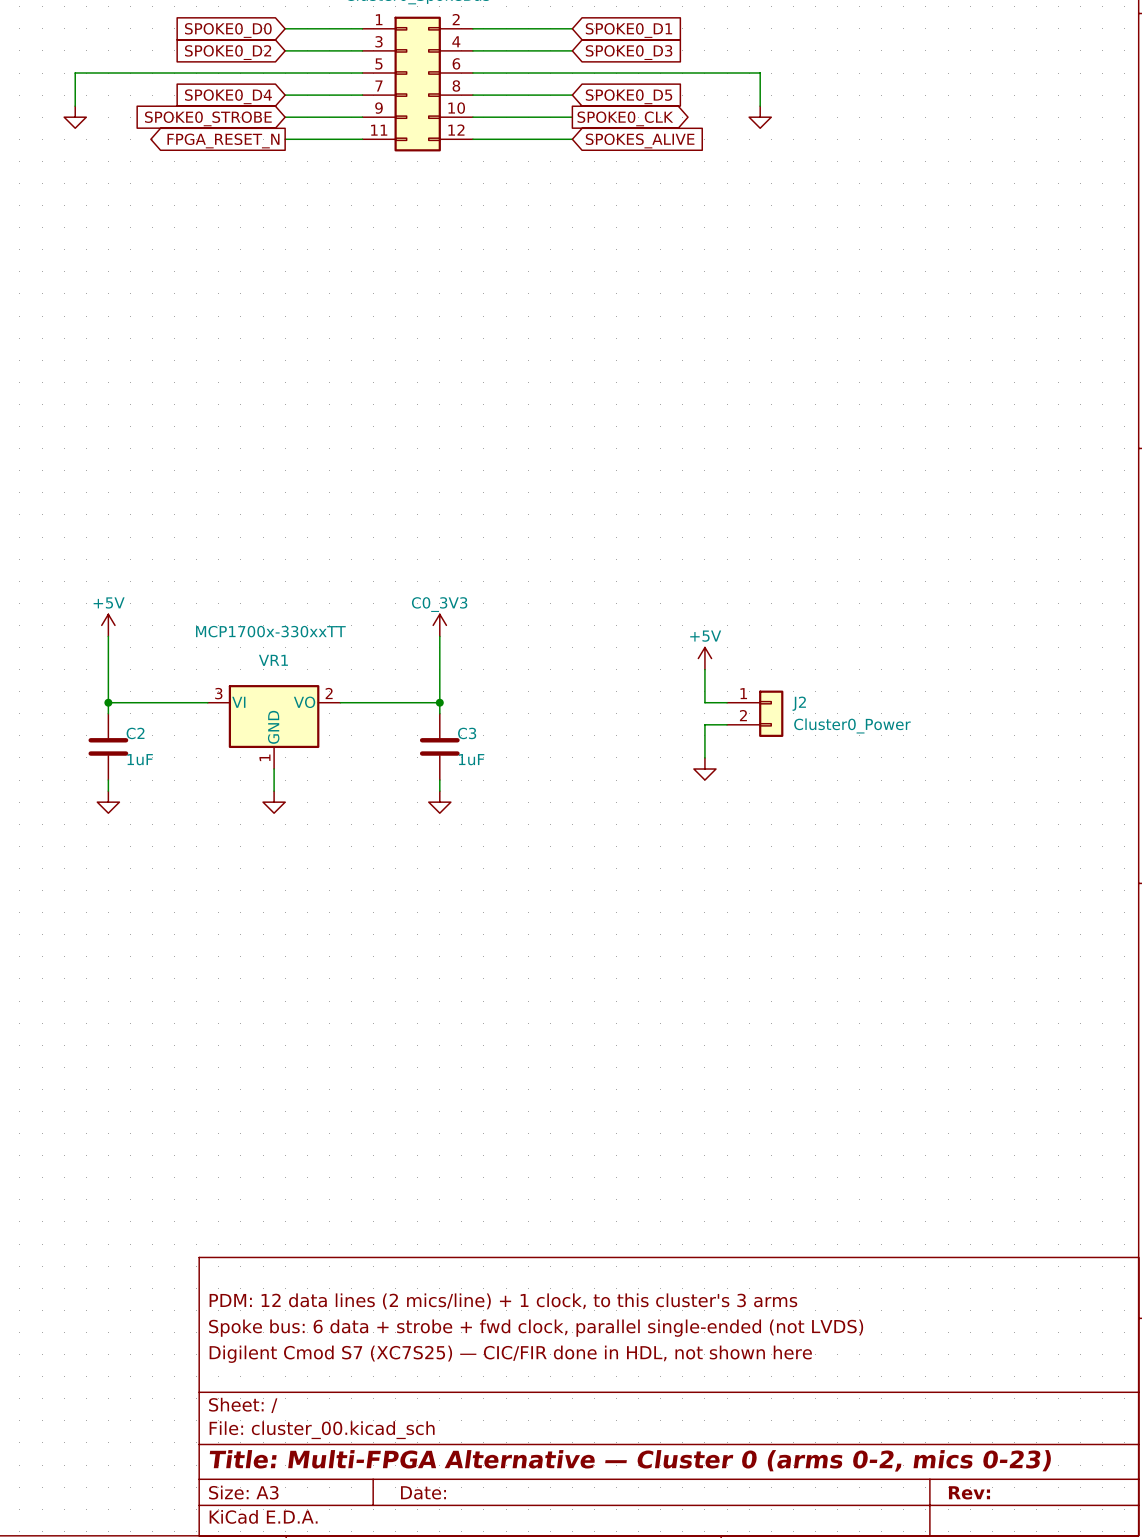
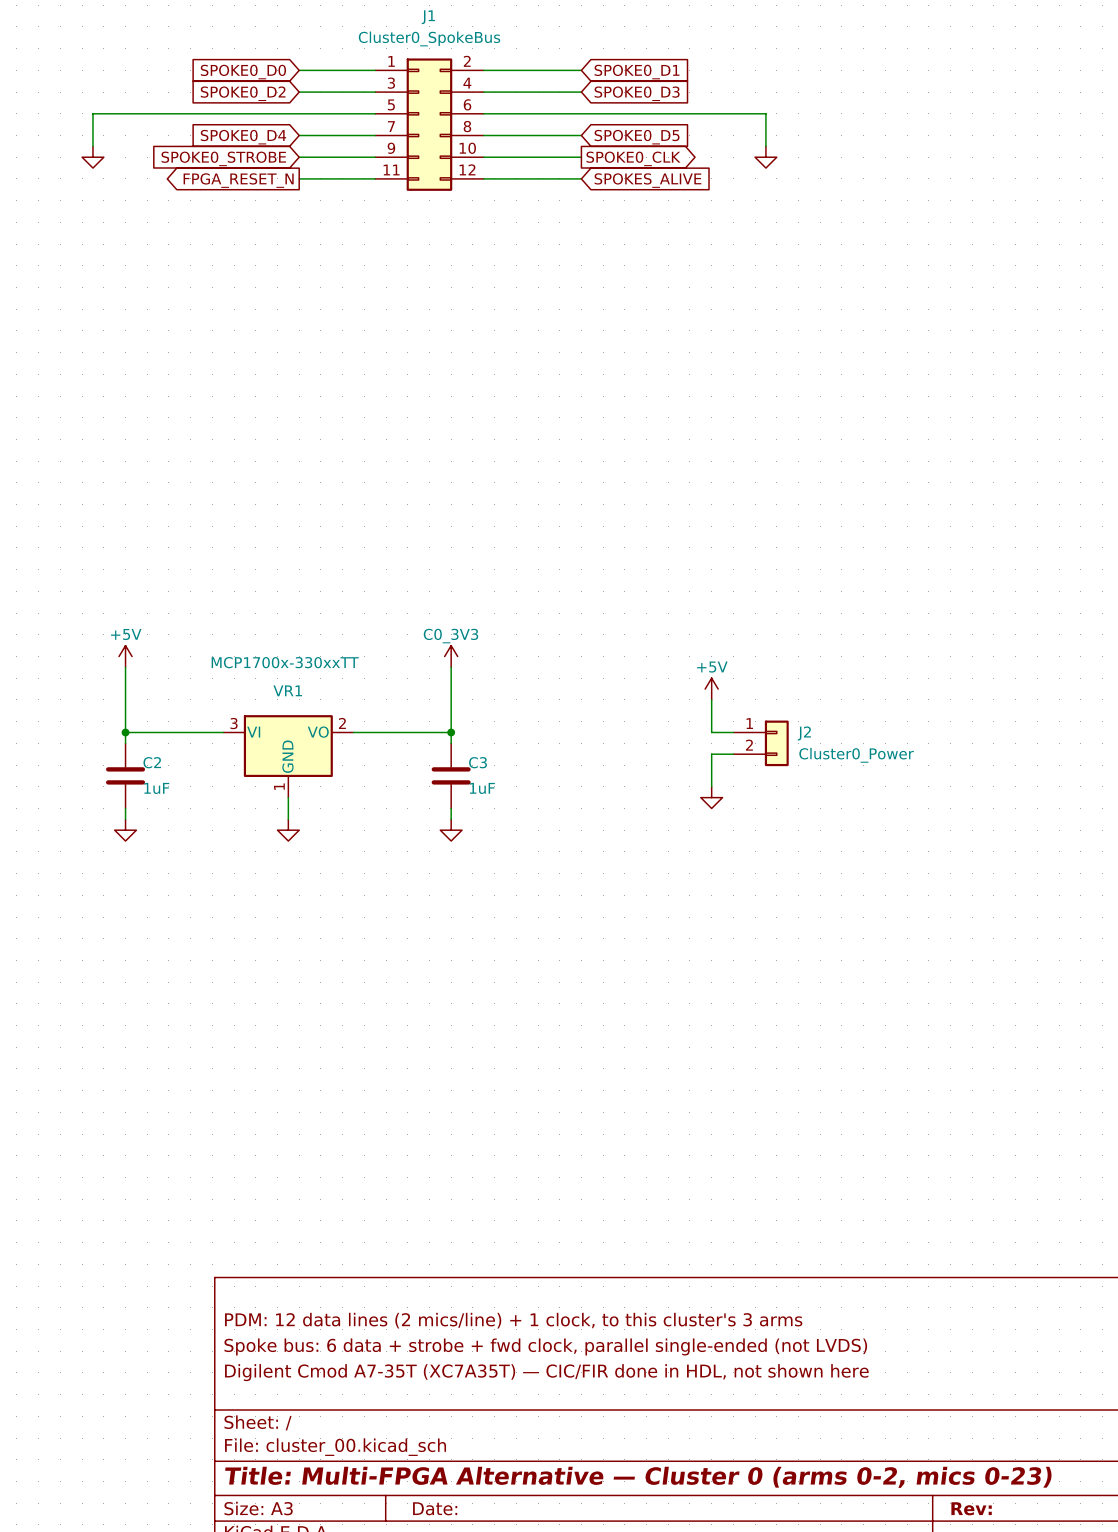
title block: Digilent Cmod S7 (XC7S25) — CIC/FIR done in HDL, not shown here (510, 1354) -> Digilent Cmod A7-35T (XC7A35T) — CIC/FIR done in HDL, not shown here (546, 1372)

